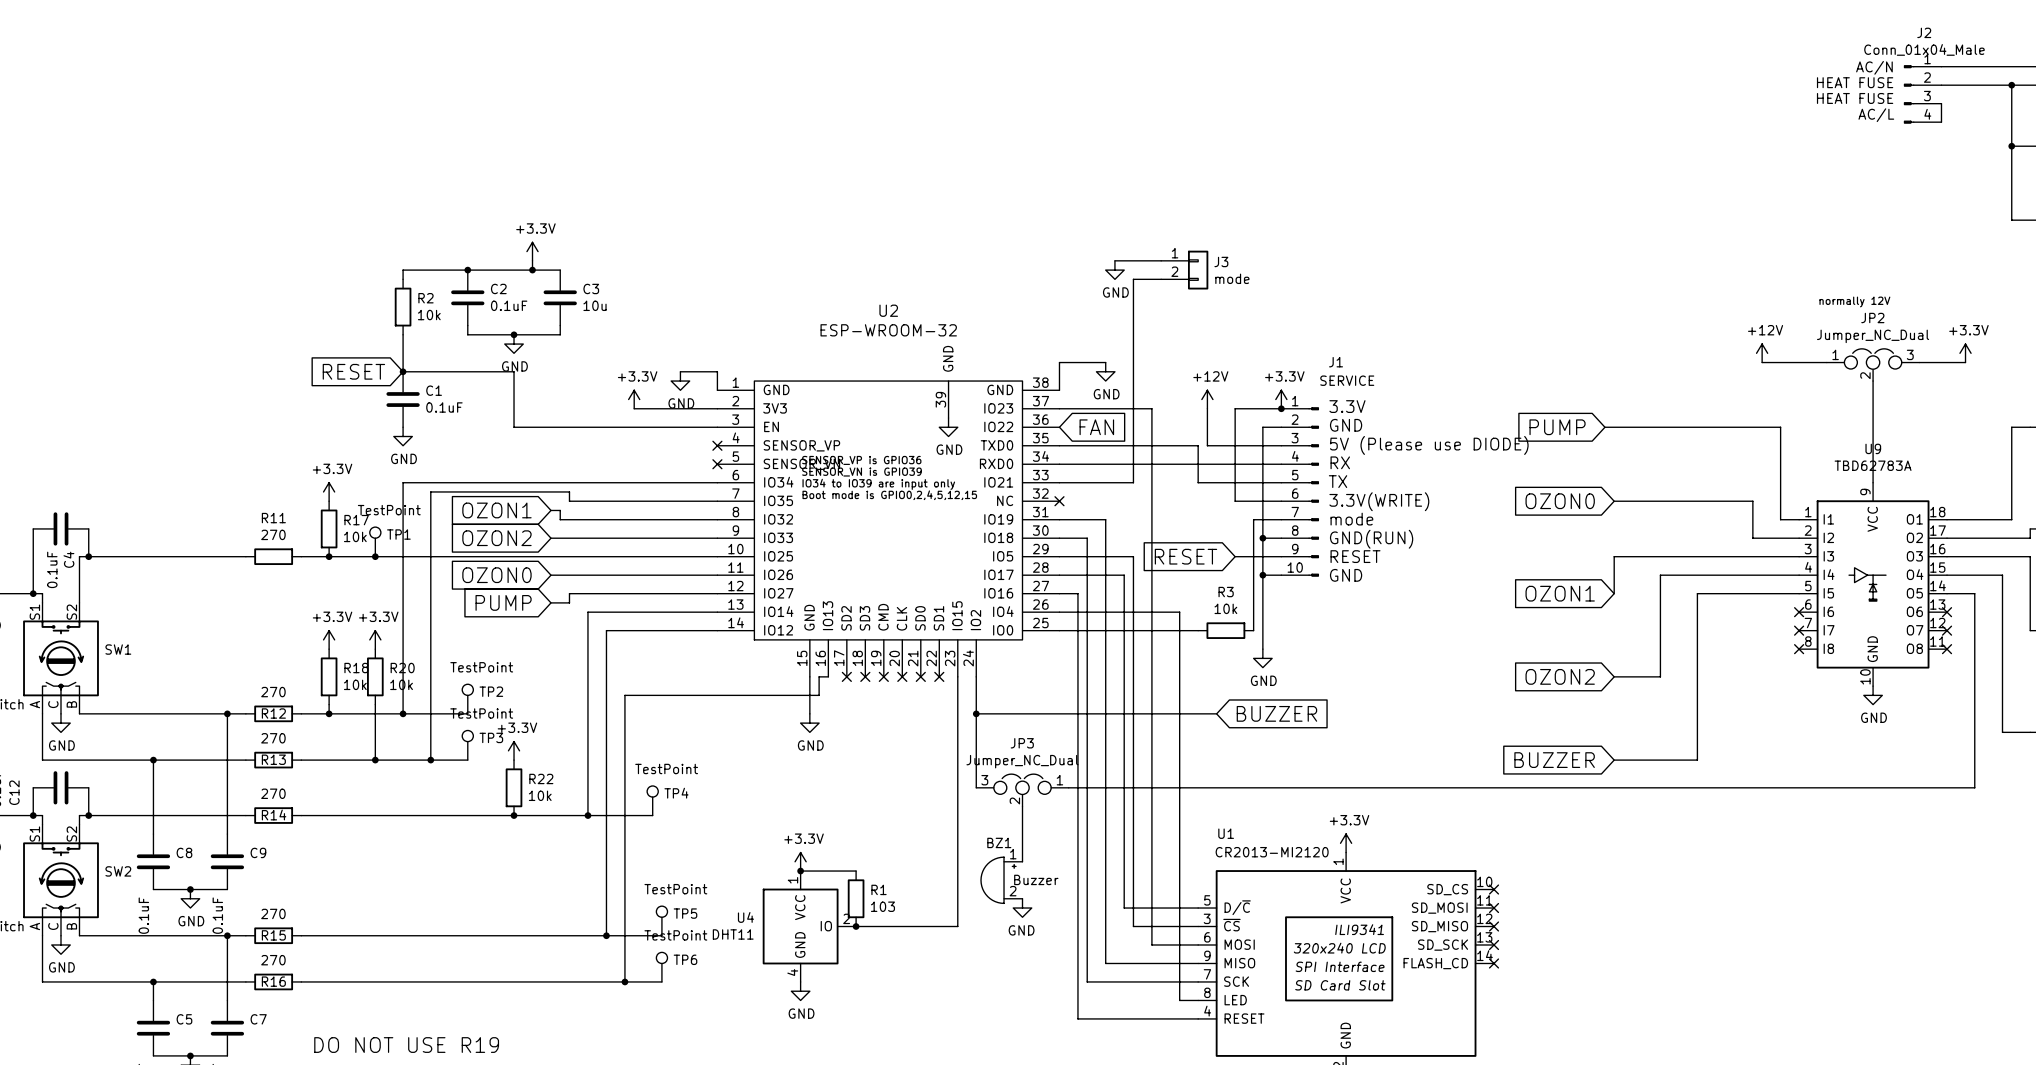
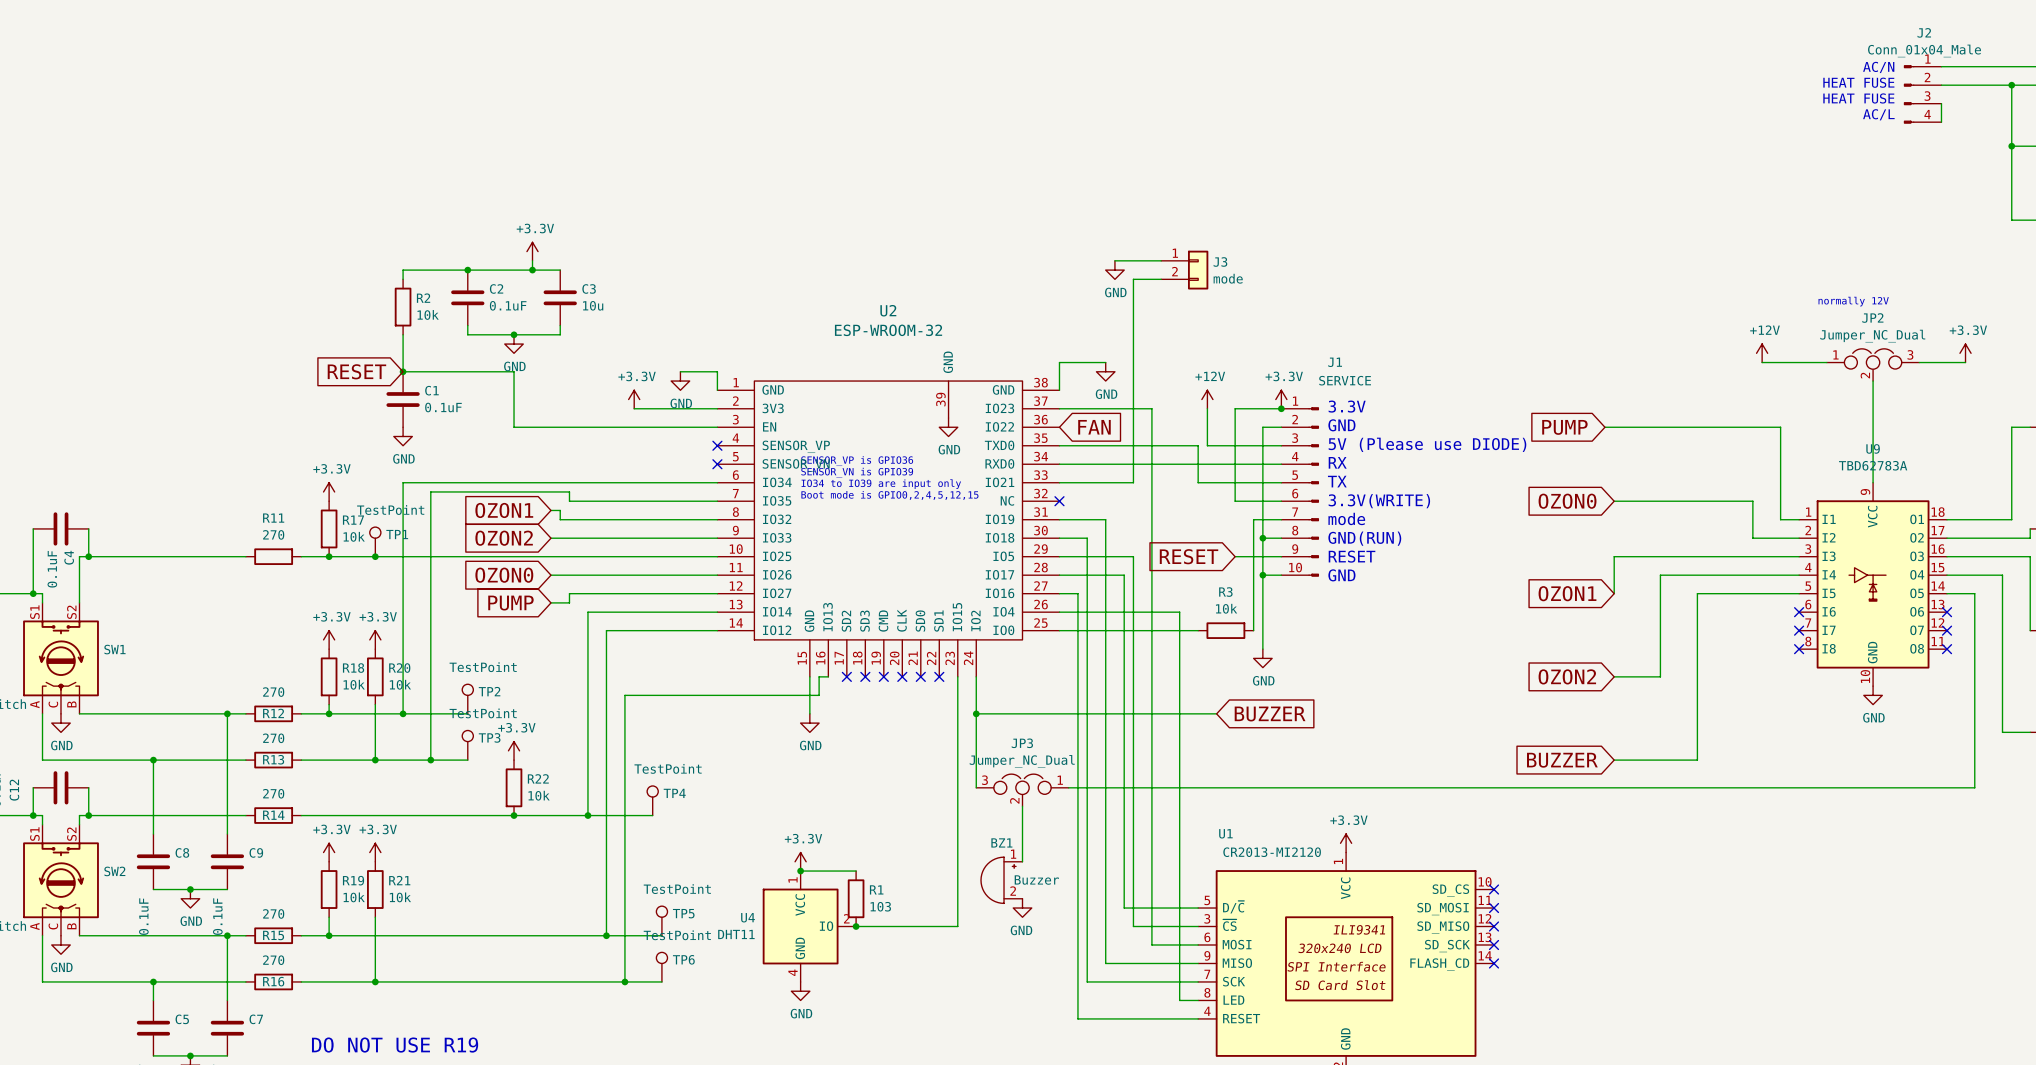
power symbol: none -> +3.3V (329, 852)
power symbol: none -> +3.3V (375, 852)
R19: none -> 10k (329, 889)
R21: none -> 10k (375, 889)
wire: none -> (329, 917) (329, 935)
wire: none -> (375, 917) (375, 981)
junction: none -> (329, 935)
junction: none -> (375, 981)

